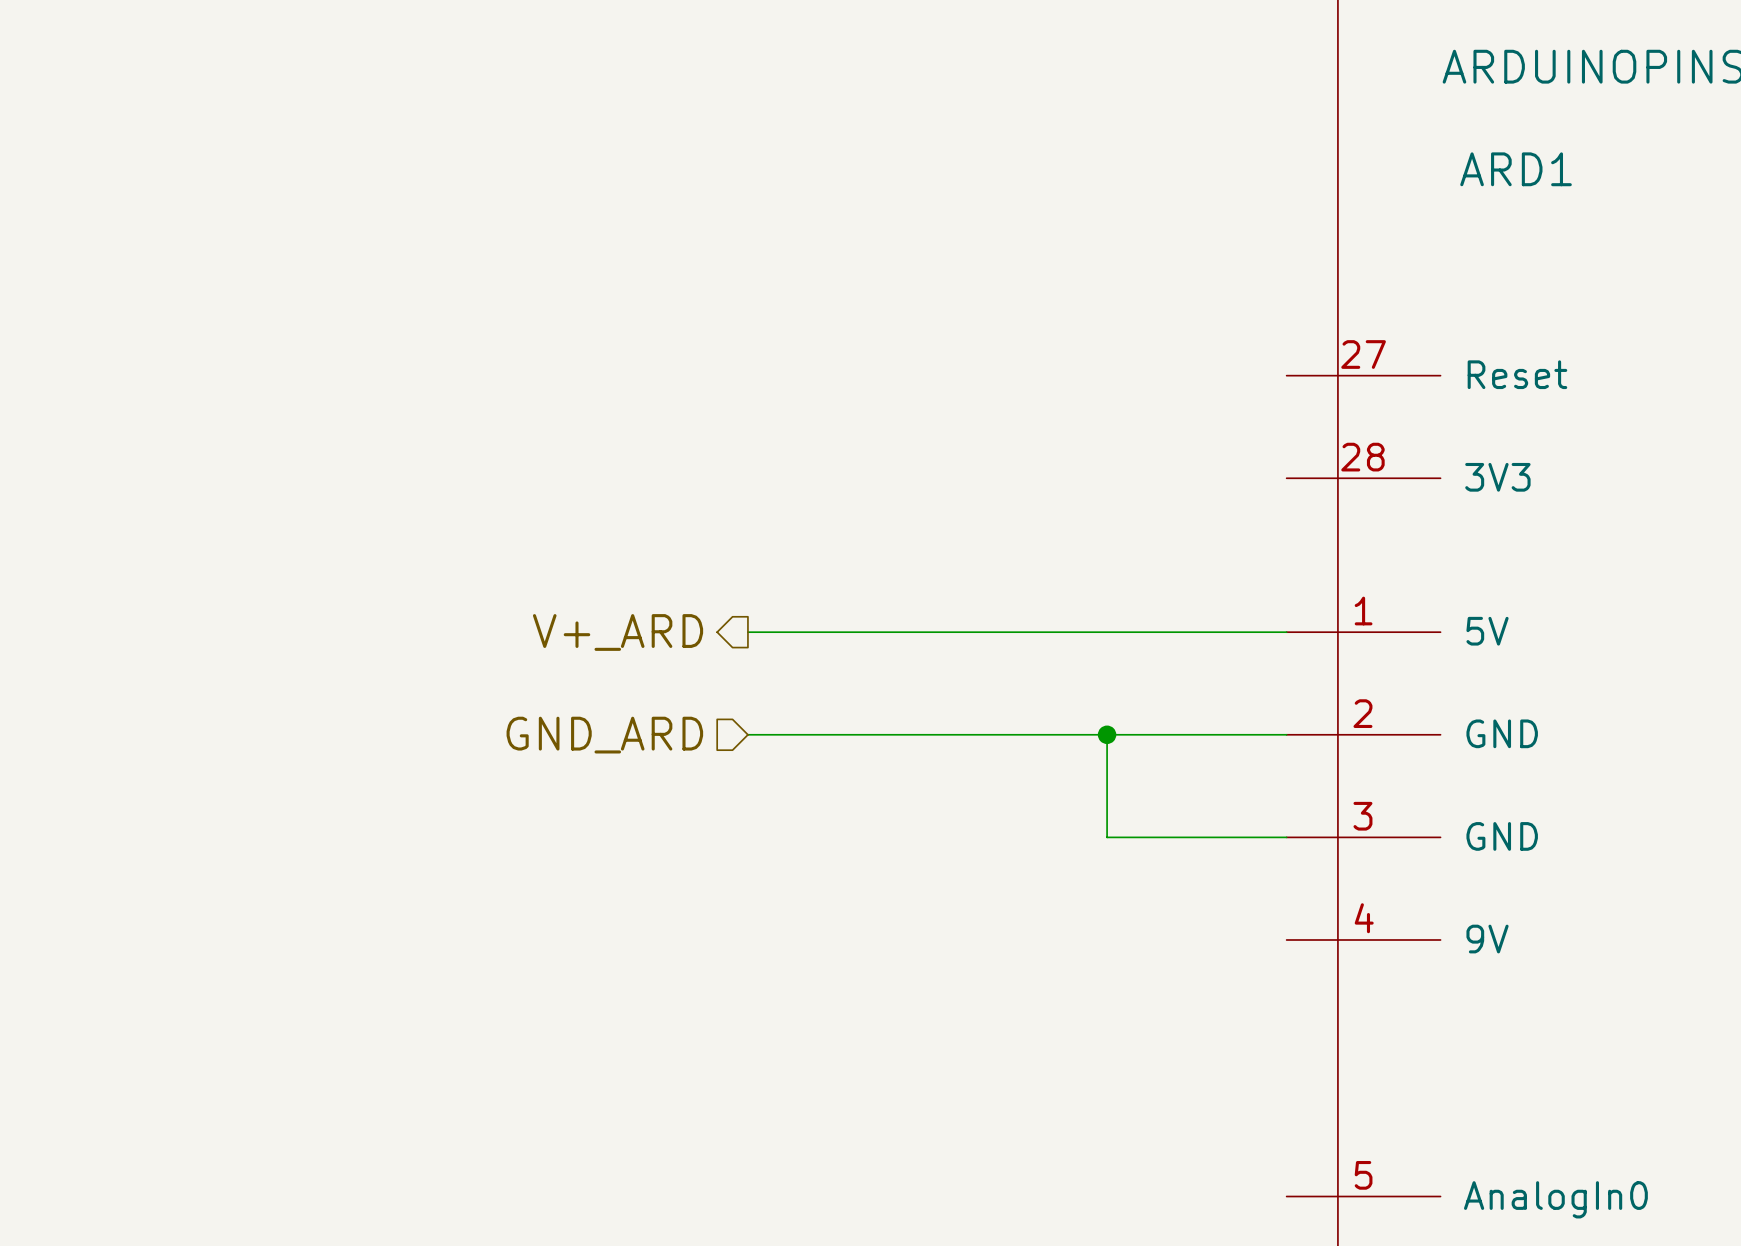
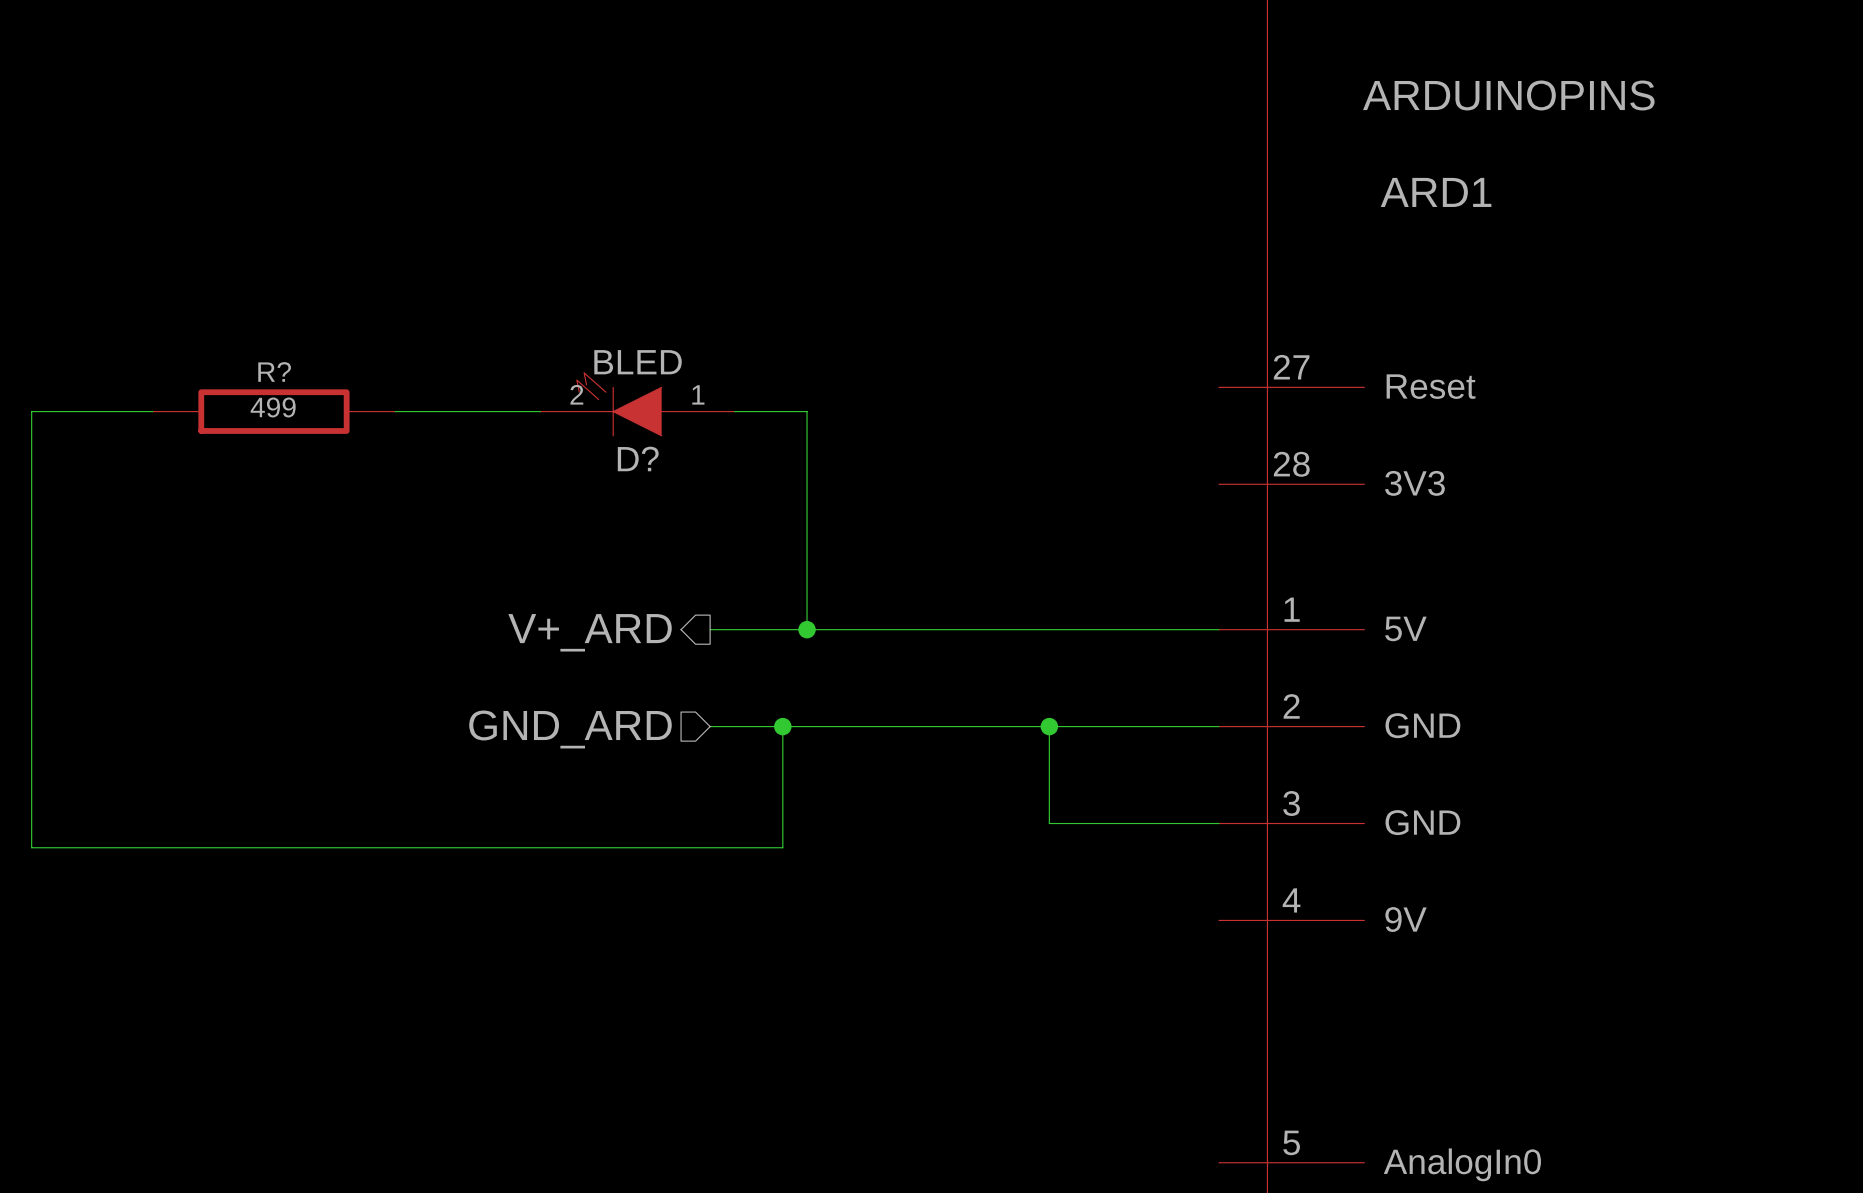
D?: none -> BLED (637, 404)
wire: none -> (152, 411) (31, 411) (31, 847) (782, 847) (782, 726)
R?: none -> 499 (273, 411)
wire: none -> (395, 411) (540, 411)
wire: none -> (734, 411) (807, 411) (807, 629)
junction: none -> (807, 629)
junction: none -> (782, 726)

